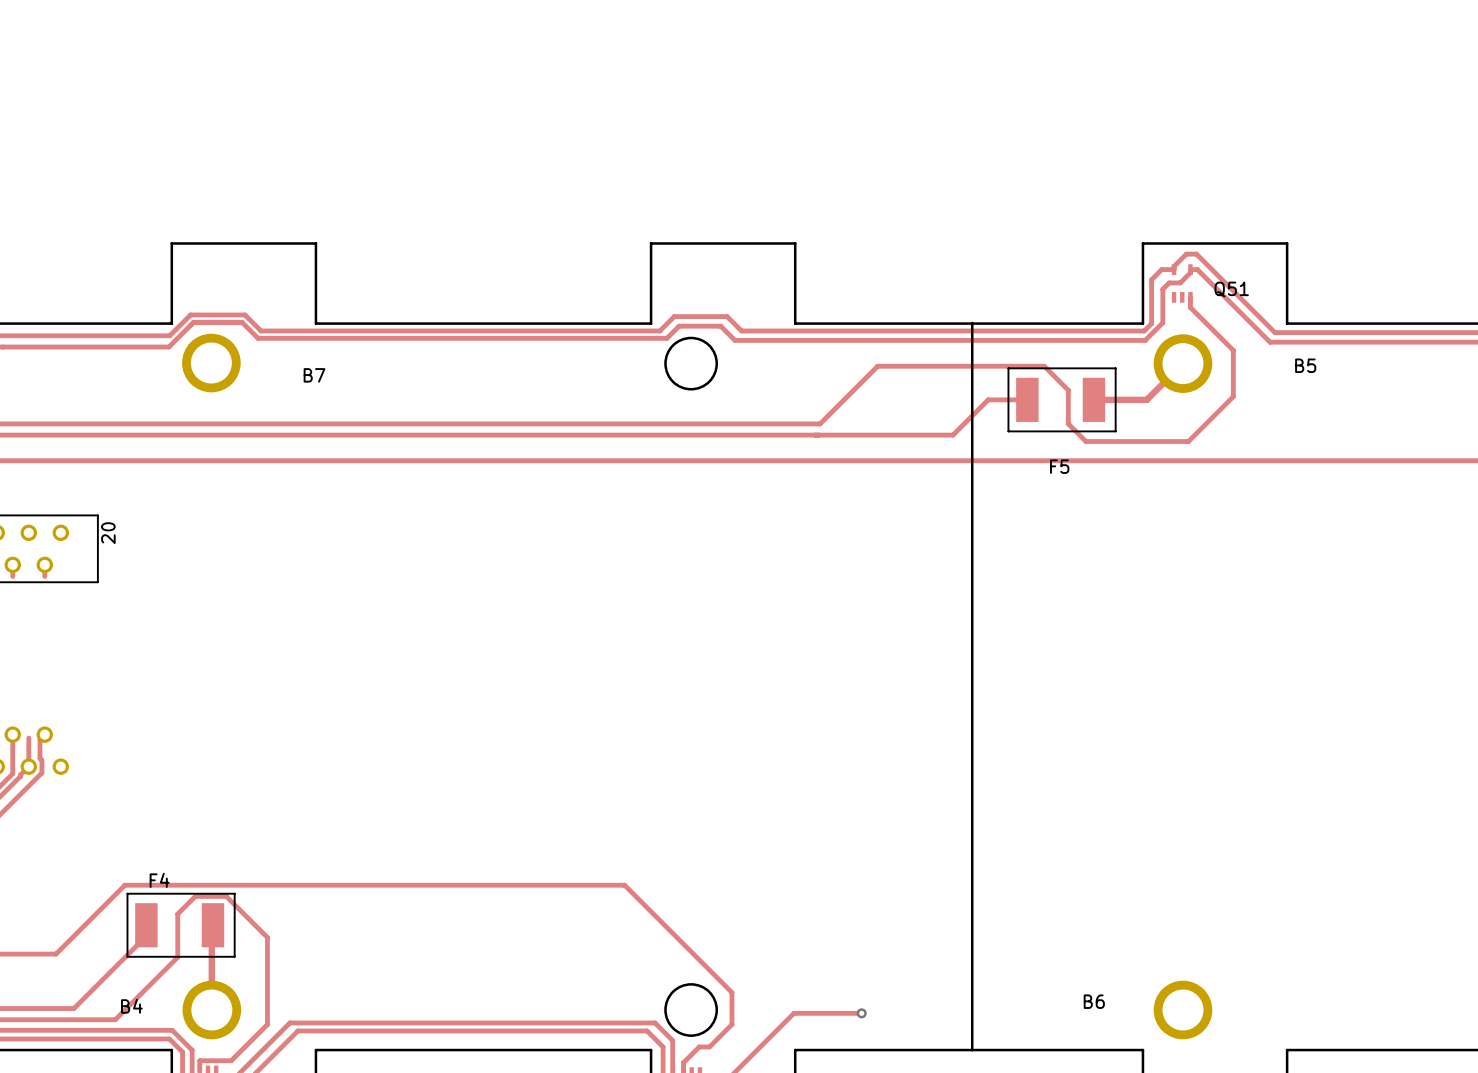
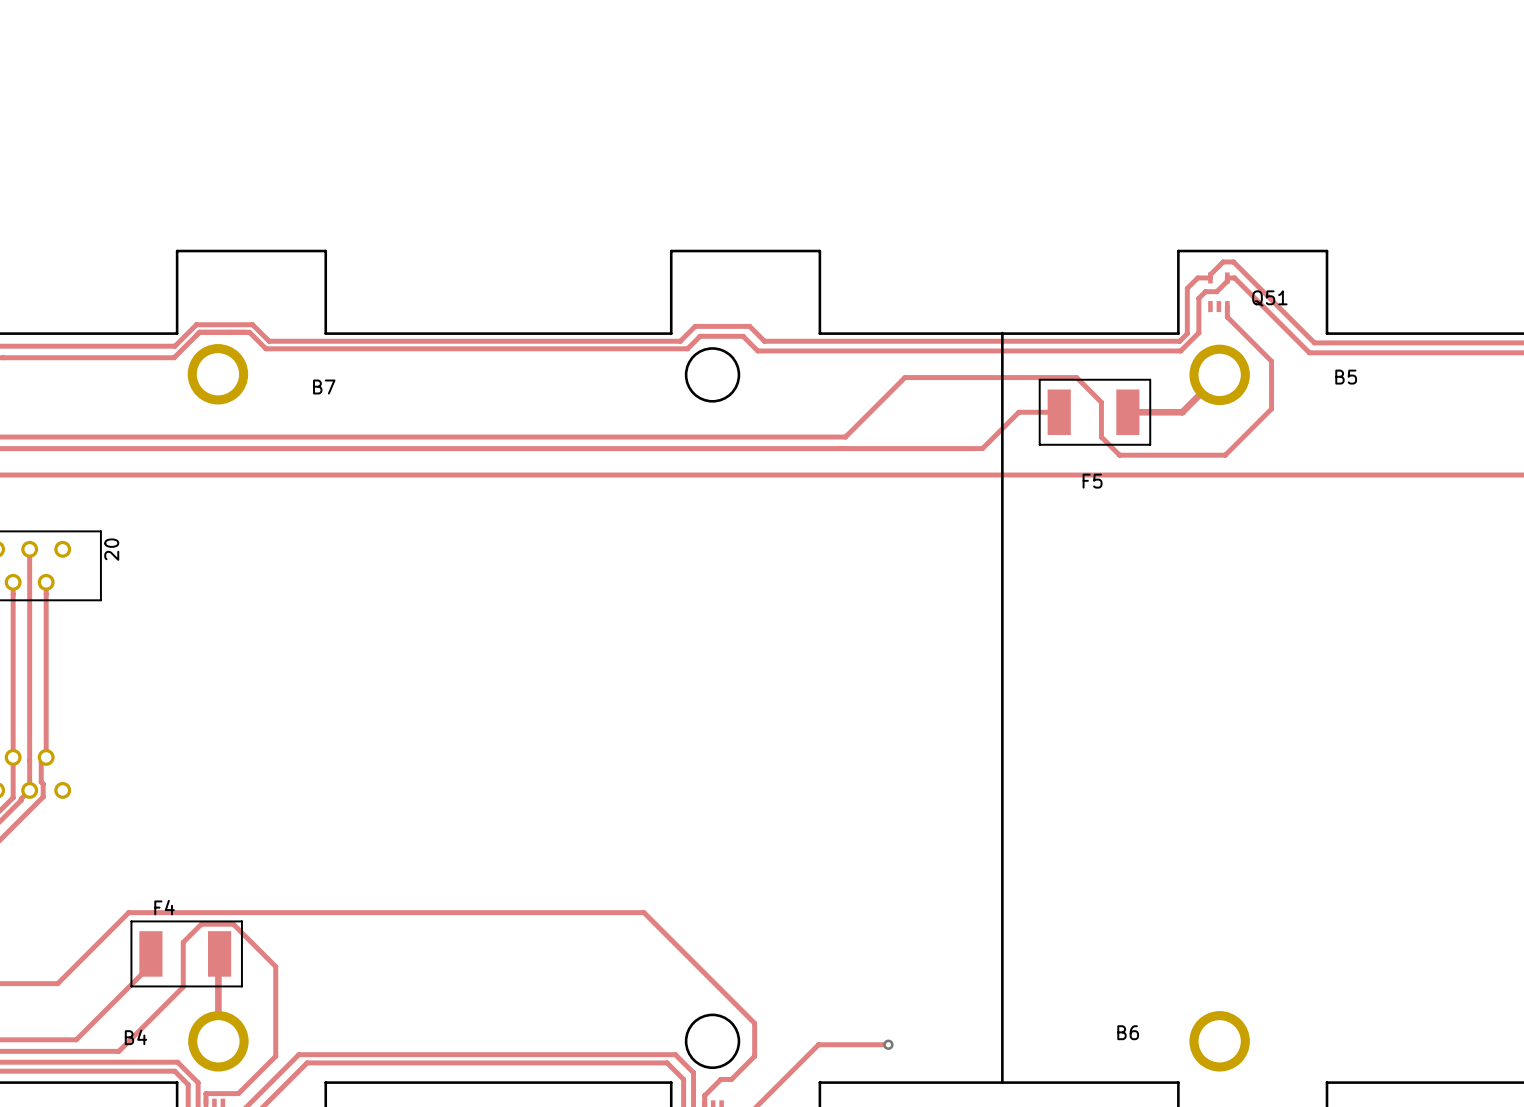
track: none -> (29, 549) (29, 760)
track: none -> (13, 594) (13, 757)
track: none -> (46, 594) (46, 757)

